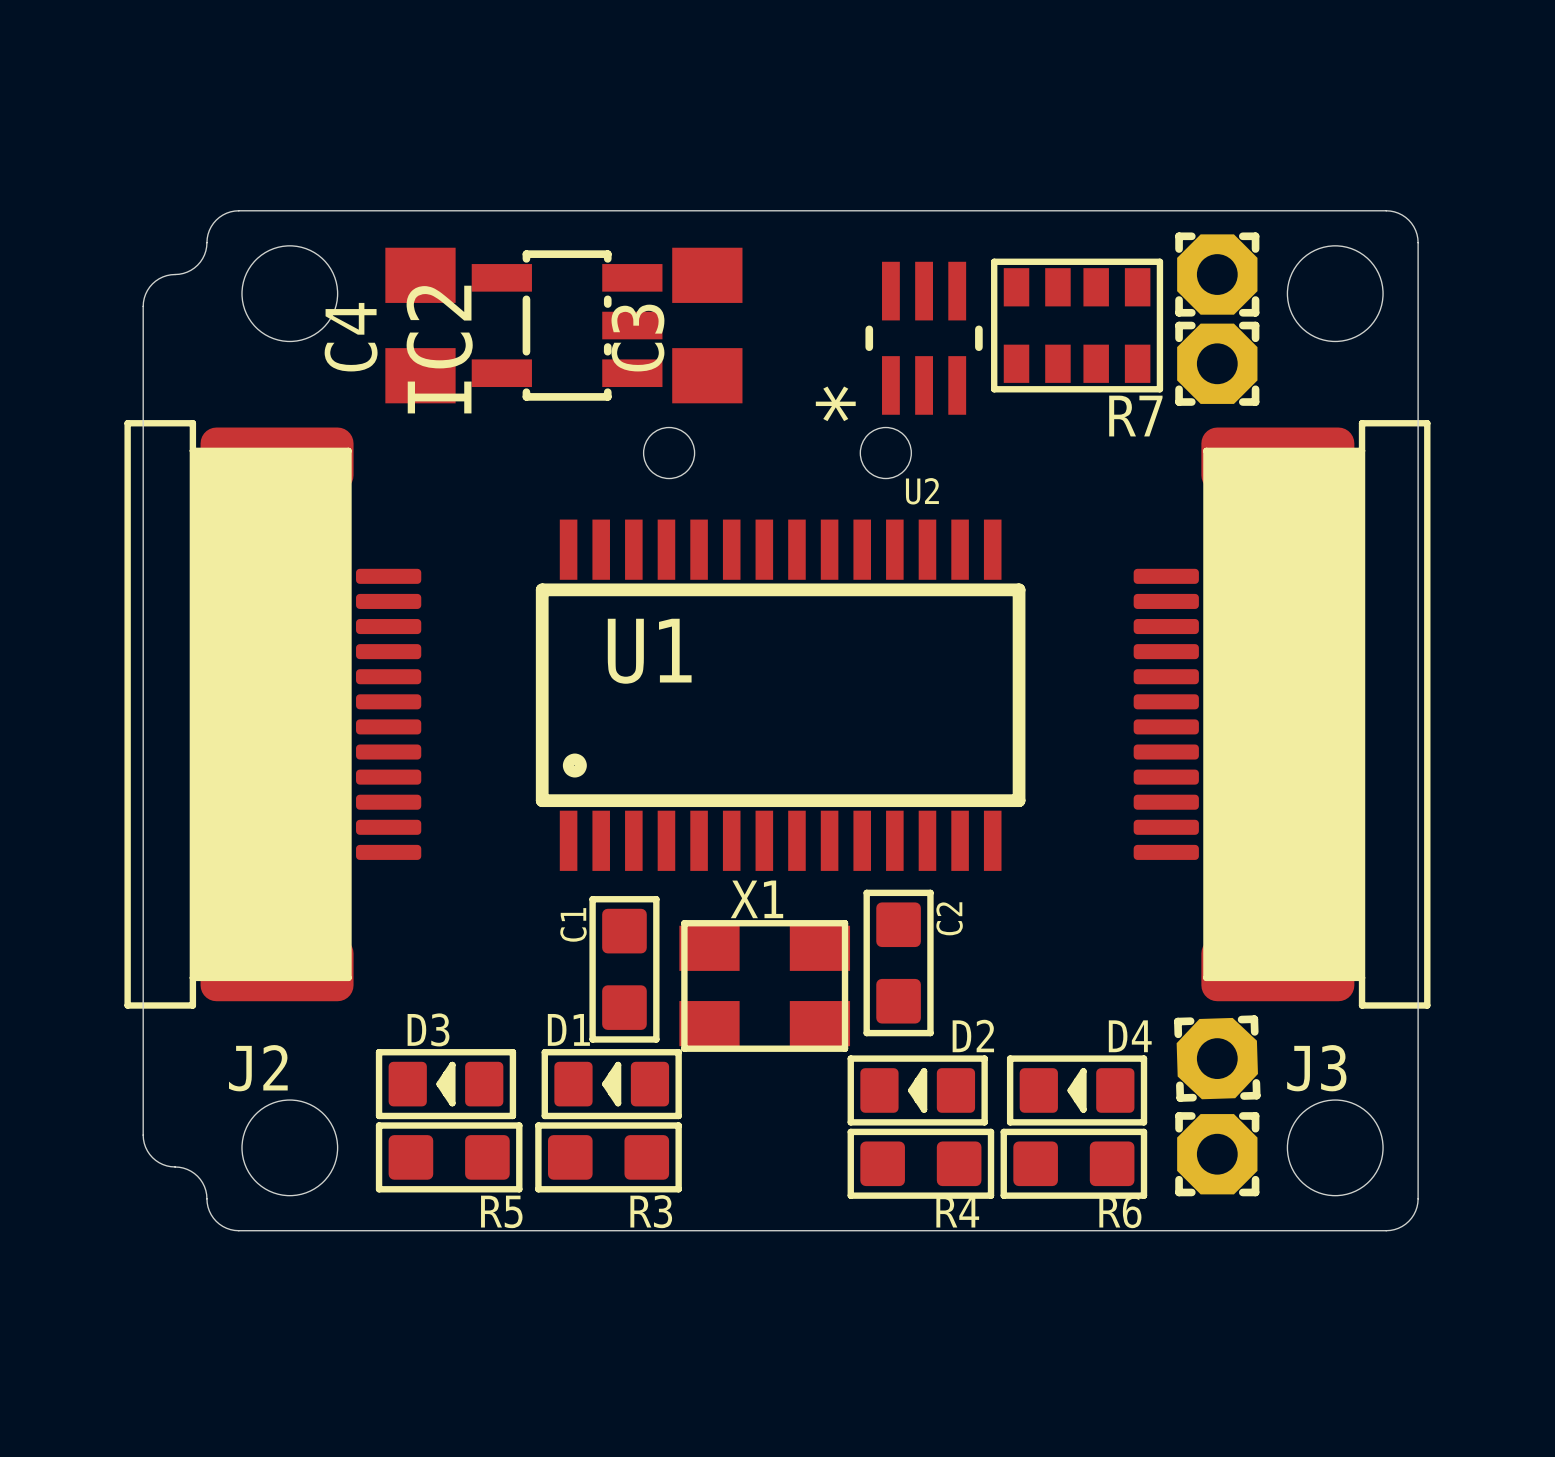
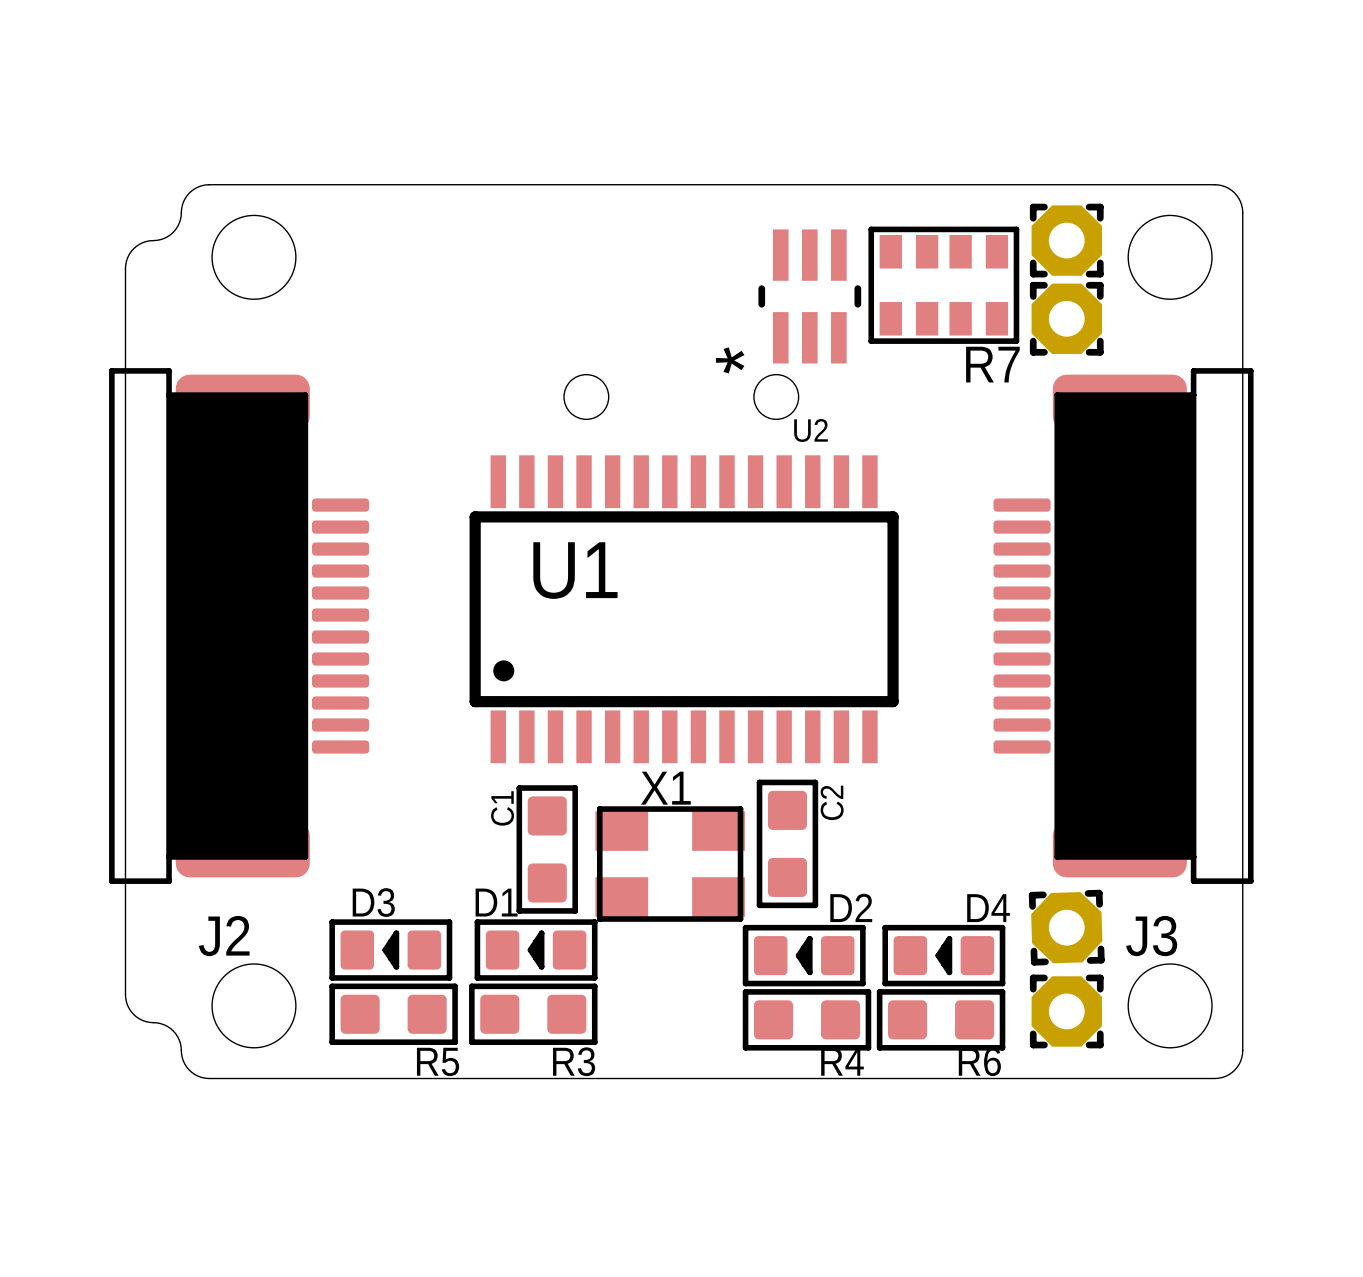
C4: (420, 325) -> none
IC2: (567, 325) -> none
C3: (707, 325) -> none

